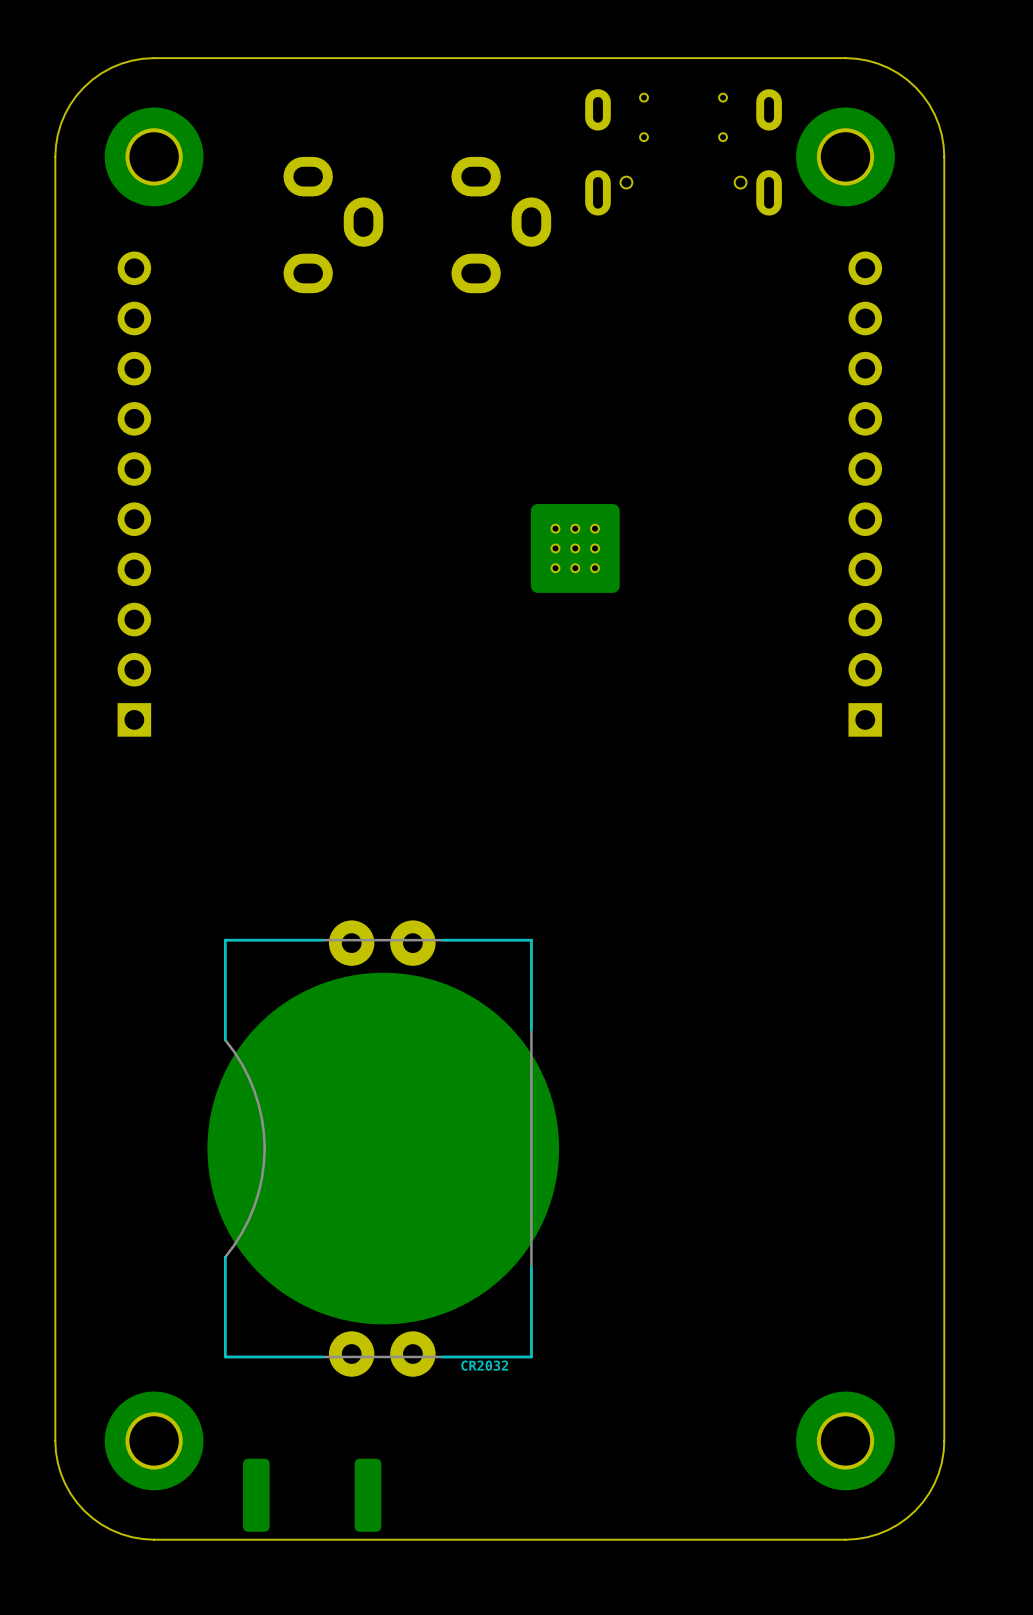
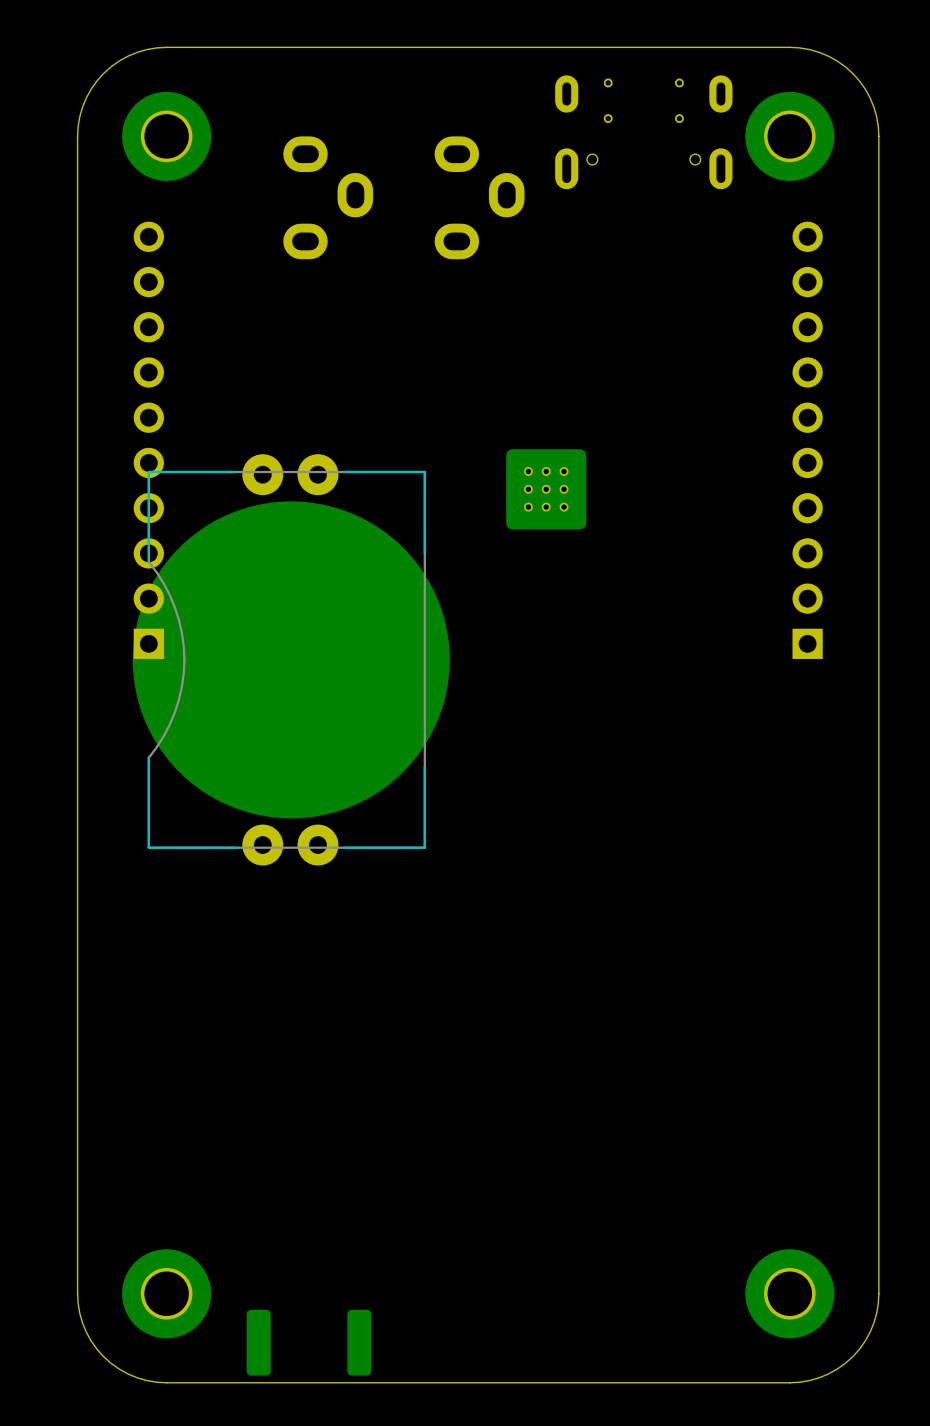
part position: (383, 1148) -> (291, 659)
text: CR2032 (484, 1365) -> none

